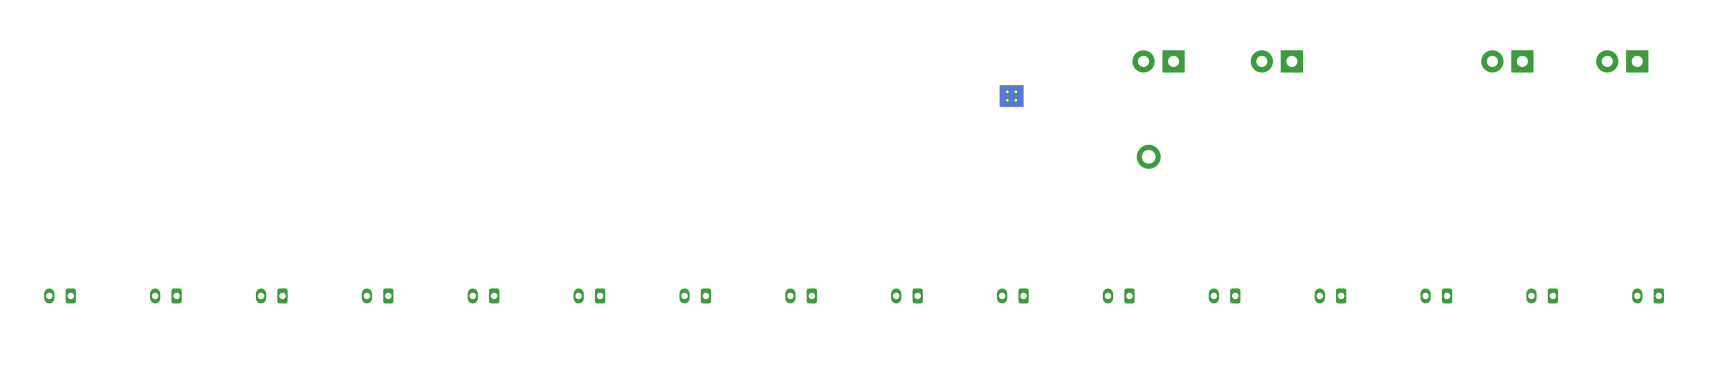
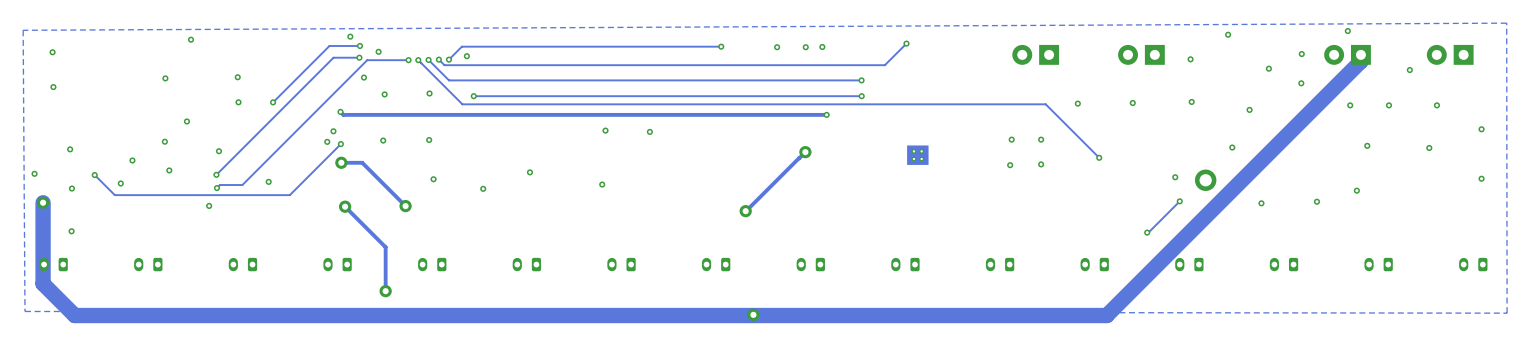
zone outline: none -> (1506, 23) (1507, 313) (24, 311) (23, 30) (1506, 23)
via: none -> (1347, 31)
via: none -> (1228, 34)
via: none -> (350, 36)
via: none -> (190, 39)
track: none -> (906, 43) (884, 65) (444, 65) (438, 59)
via: none -> (906, 43)
track: none -> (359, 45) (329, 45) (273, 102)
via: none -> (359, 45)
track: none -> (721, 46) (461, 46) (448, 59)
via: none -> (721, 46)
via: none -> (777, 47)
via: none -> (805, 47)
via: none -> (822, 46)
via: none -> (378, 51)
via: none -> (52, 52)
via: none -> (1301, 54)
track: none -> (1360, 54) (1360, 61) (1106, 315) (74, 315) (43, 283) (43, 202)
via: none -> (466, 56)
track: none -> (359, 57) (333, 57) (216, 174)
via: none -> (359, 57)
via: none -> (438, 59)
via: none -> (448, 59)
via: none -> (1190, 59)
track: none -> (408, 60) (367, 60) (242, 185) (220, 185) (216, 188)
via: none -> (408, 60)
track: none -> (418, 60) (462, 104) (1045, 104) (1099, 157)
via: none -> (418, 60)
track: none -> (428, 59) (449, 80) (861, 80)
via: none -> (428, 59)
via: none -> (1268, 68)
via: none -> (1409, 70)
via: none -> (237, 77)
via: none -> (363, 77)
via: none -> (165, 78)
via: none -> (861, 80)
via: none -> (1301, 83)
part position: (1011, 96) -> (917, 155)
via: none -> (53, 87)
via: none -> (429, 93)
via: none -> (384, 94)
via: none -> (473, 96)
track: none -> (861, 96) (473, 96)
via: none -> (861, 96)
via: none -> (238, 102)
via: none -> (273, 102)
via: none -> (1191, 101)
via: none -> (1077, 103)
via: none -> (1132, 103)
via: none -> (1350, 105)
via: none -> (1388, 105)
via: none -> (1436, 105)
via: none -> (1249, 109)
track: none -> (340, 111) (343, 114) (826, 114)
via: none -> (340, 111)
via: none -> (826, 114)
via: none -> (186, 121)
via: none -> (1481, 129)
via: none -> (333, 131)
via: none -> (605, 130)
via: none -> (649, 131)
via: none -> (429, 140)
via: none -> (1011, 139)
part position: (1148, 156) -> (1205, 180)
via: none -> (1041, 139)
via: none -> (383, 140)
via: none -> (164, 141)
via: none -> (327, 141)
track: none -> (340, 144) (289, 195) (114, 195) (94, 175)
via: none -> (340, 144)
via: none -> (1367, 145)
via: none -> (1232, 147)
via: none -> (1429, 147)
via: none -> (70, 149)
via: none -> (218, 151)
track: none -> (805, 152) (745, 211)
via: none -> (805, 152)
via: none -> (1099, 157)
via: none -> (132, 160)
track: none -> (341, 162) (362, 162) (405, 206)
via: none -> (341, 162)
via: none -> (1041, 164)
via: none -> (1010, 165)
via: none -> (169, 170)
via: none -> (529, 172)
via: none -> (34, 173)
via: none -> (94, 175)
via: none -> (216, 174)
via: none -> (1175, 177)
via: none -> (1481, 178)
via: none -> (433, 179)
via: none -> (268, 181)
via: none -> (120, 183)
via: none -> (602, 184)
via: none -> (71, 188)
via: none -> (216, 188)
via: none -> (483, 188)
via: none -> (1356, 190)
track: none -> (1179, 201) (1147, 232)
via: none -> (1179, 201)
via: none -> (1316, 201)
via: none -> (43, 202)
via: none -> (1261, 203)
via: none -> (209, 205)
via: none -> (405, 206)
track: none -> (345, 206) (385, 247) (385, 291)
via: none -> (345, 206)
via: none -> (745, 211)
via: none -> (71, 231)
via: none -> (1147, 232)
via: none -> (385, 291)
via: none -> (753, 314)

